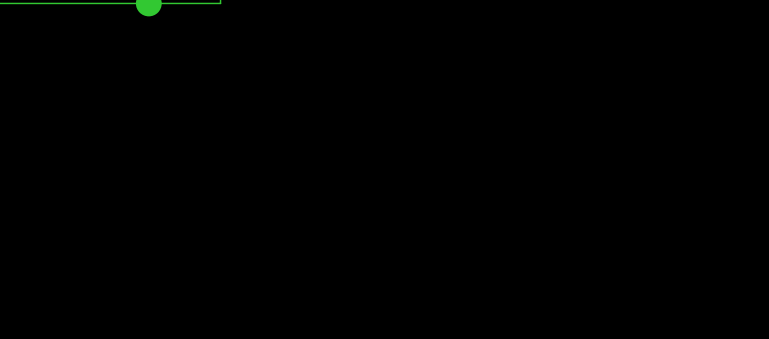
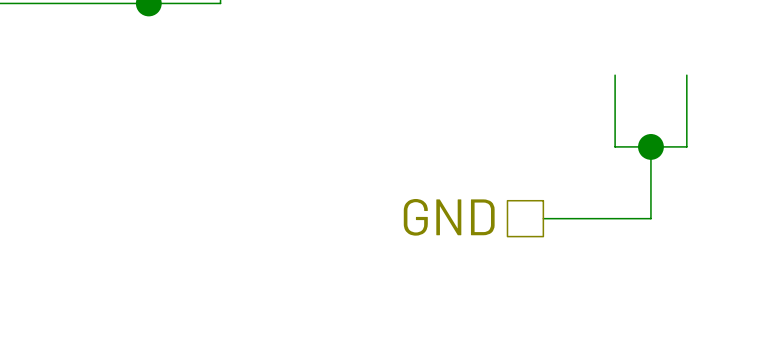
wire: none -> (615, 75) (615, 146) (686, 146) (686, 75)
wire: none -> (650, 146) (650, 218) (543, 218)
junction: none -> (650, 146)
hierarchical label: none -> GND (449, 217)

